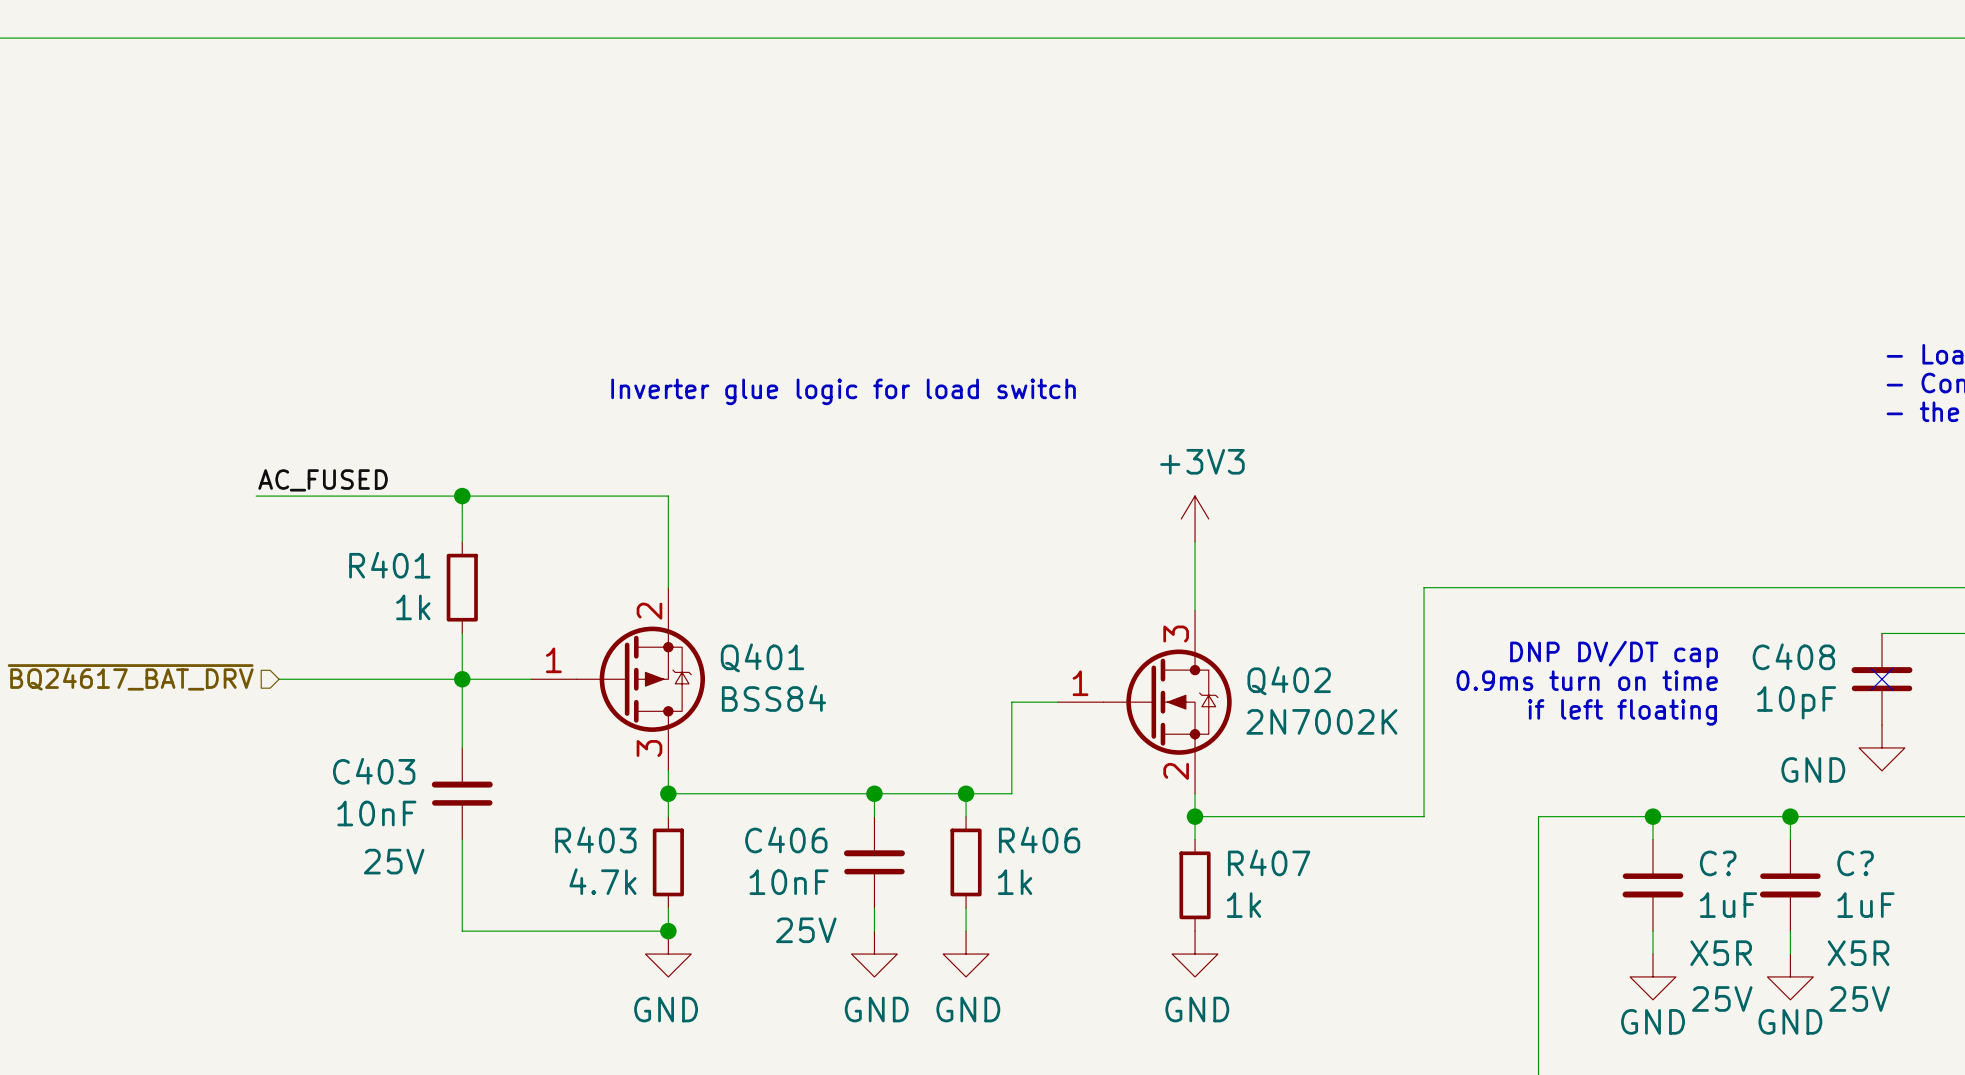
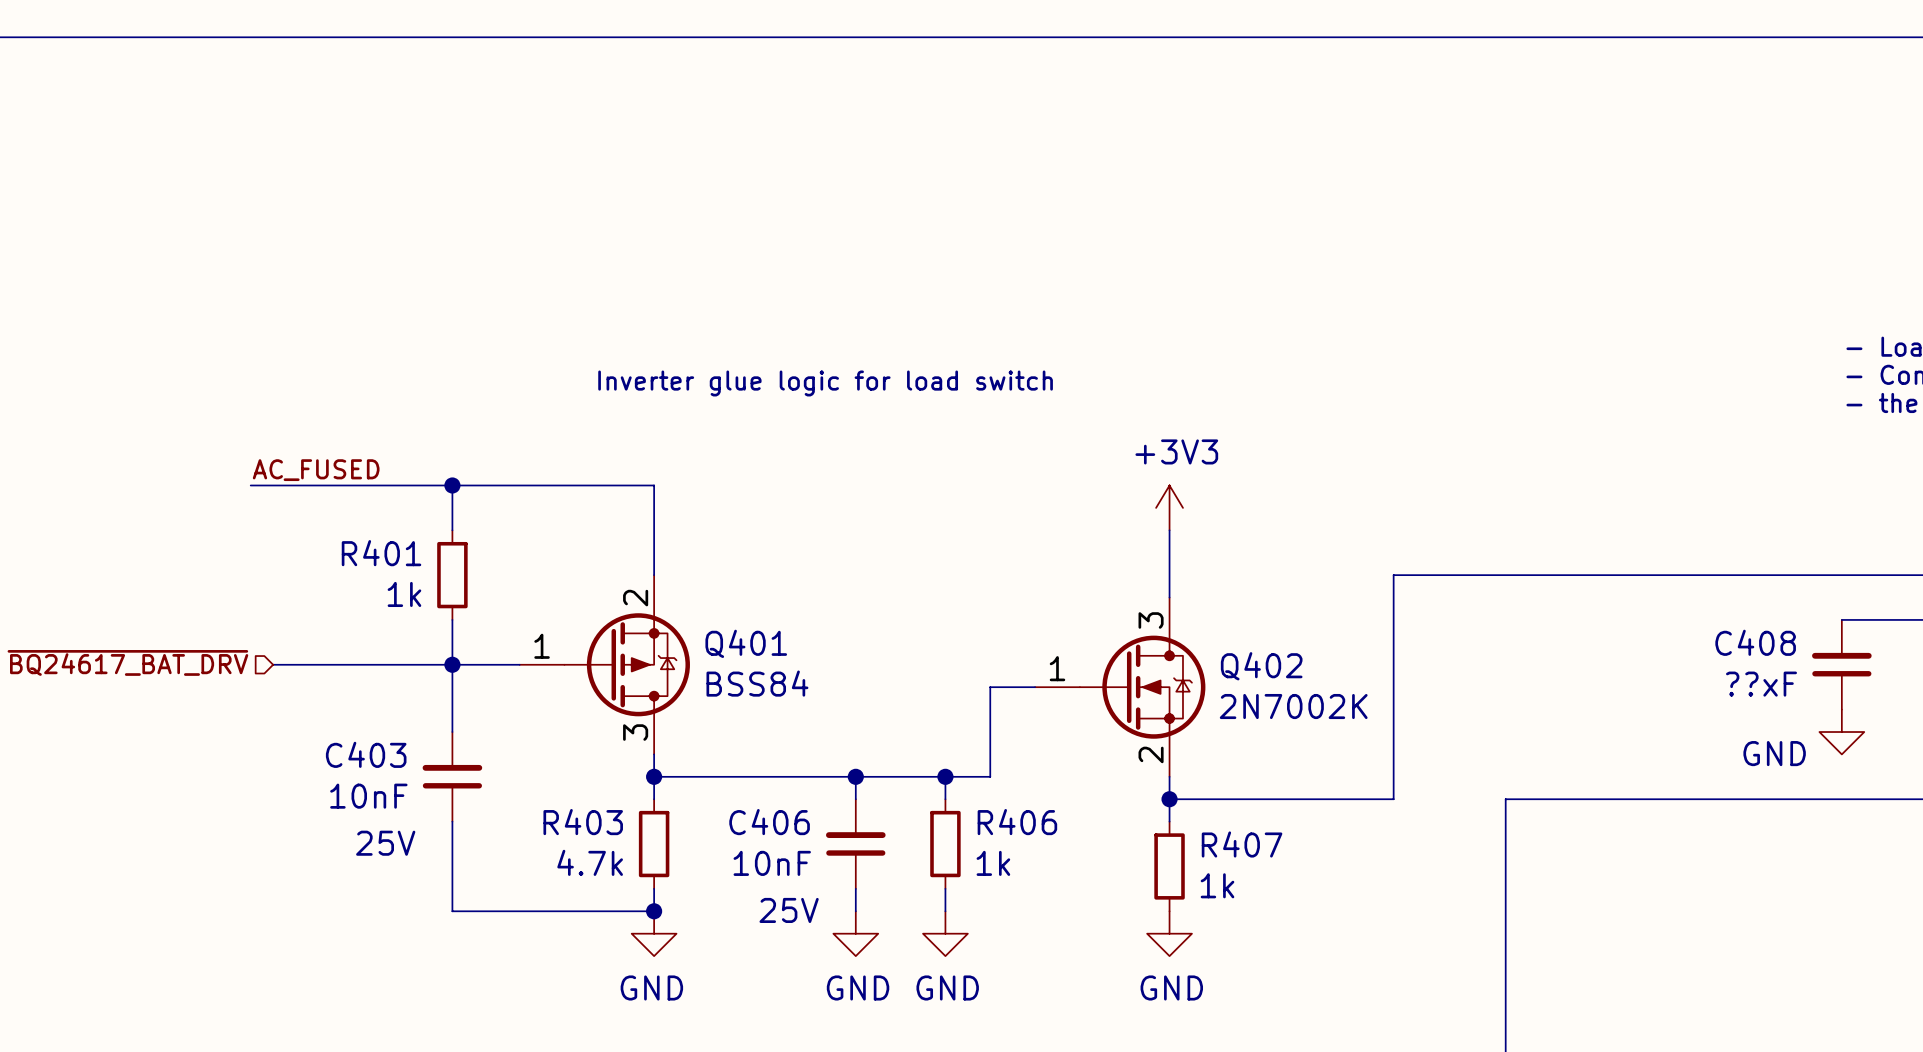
text: DNP DV/DT cap (1614, 654) -> none
no-connect mark: (1881, 679) -> none
text: 0.9ms turn on time (1587, 680) -> none
C408 value: 10pF (1796, 702) -> ??xF (1761, 684)
text: if left floating (1622, 712) -> none
wire: (1653, 816) (1653, 839) -> none
junction: (1653, 816) -> none
wire: (1790, 816) (1790, 839) -> none
junction: (1790, 816) -> none
C?: 1uF (1653, 885) -> none
C?: 1uF (1790, 885) -> none
wire: (1653, 931) (1653, 954) -> none
wire: (1790, 931) (1790, 954) -> none
power symbol: GND (1653, 976) -> none
power symbol: GND (1790, 976) -> none

